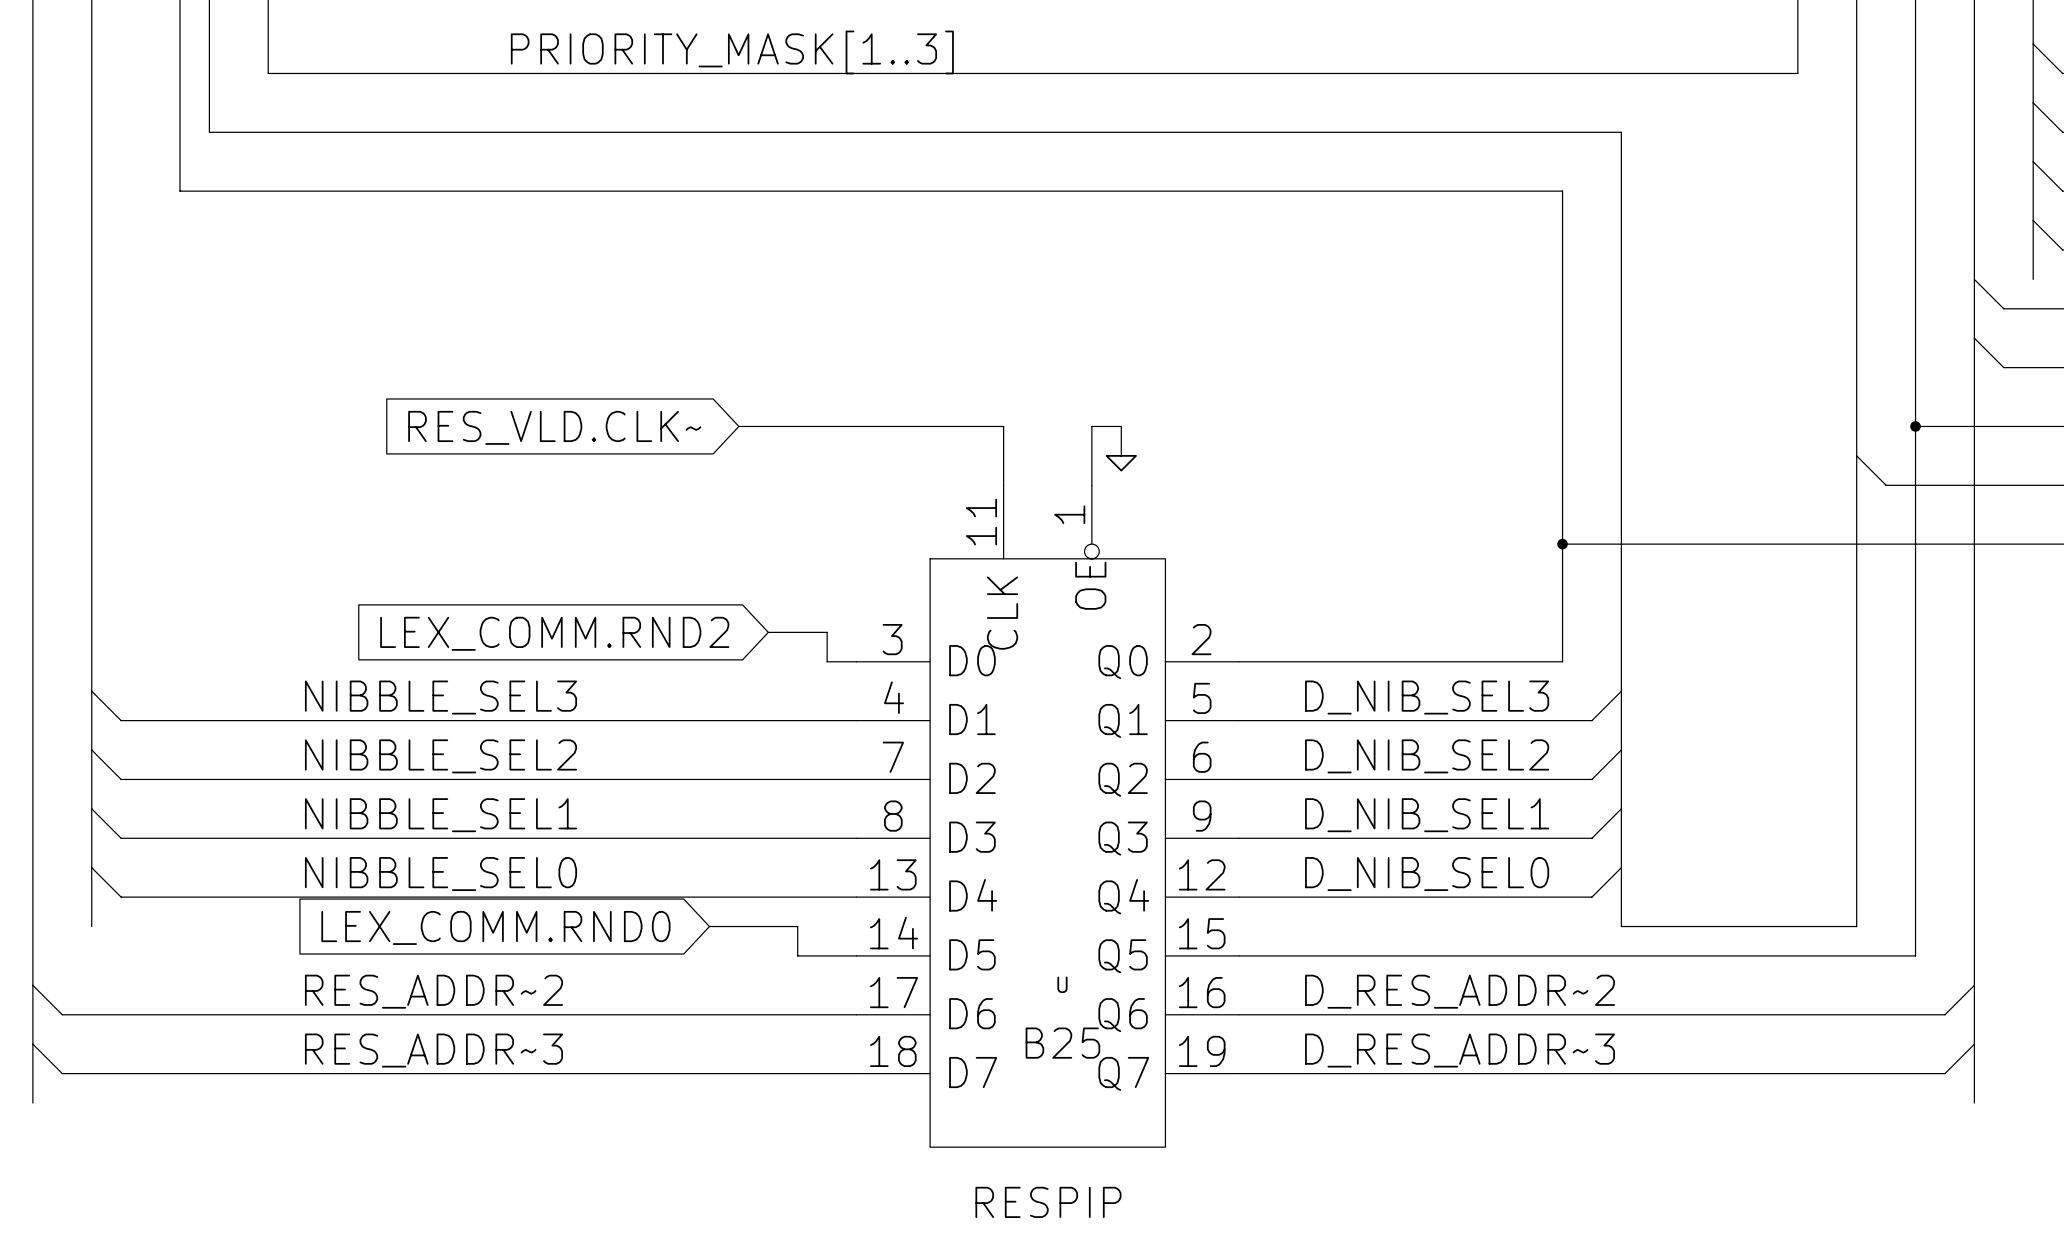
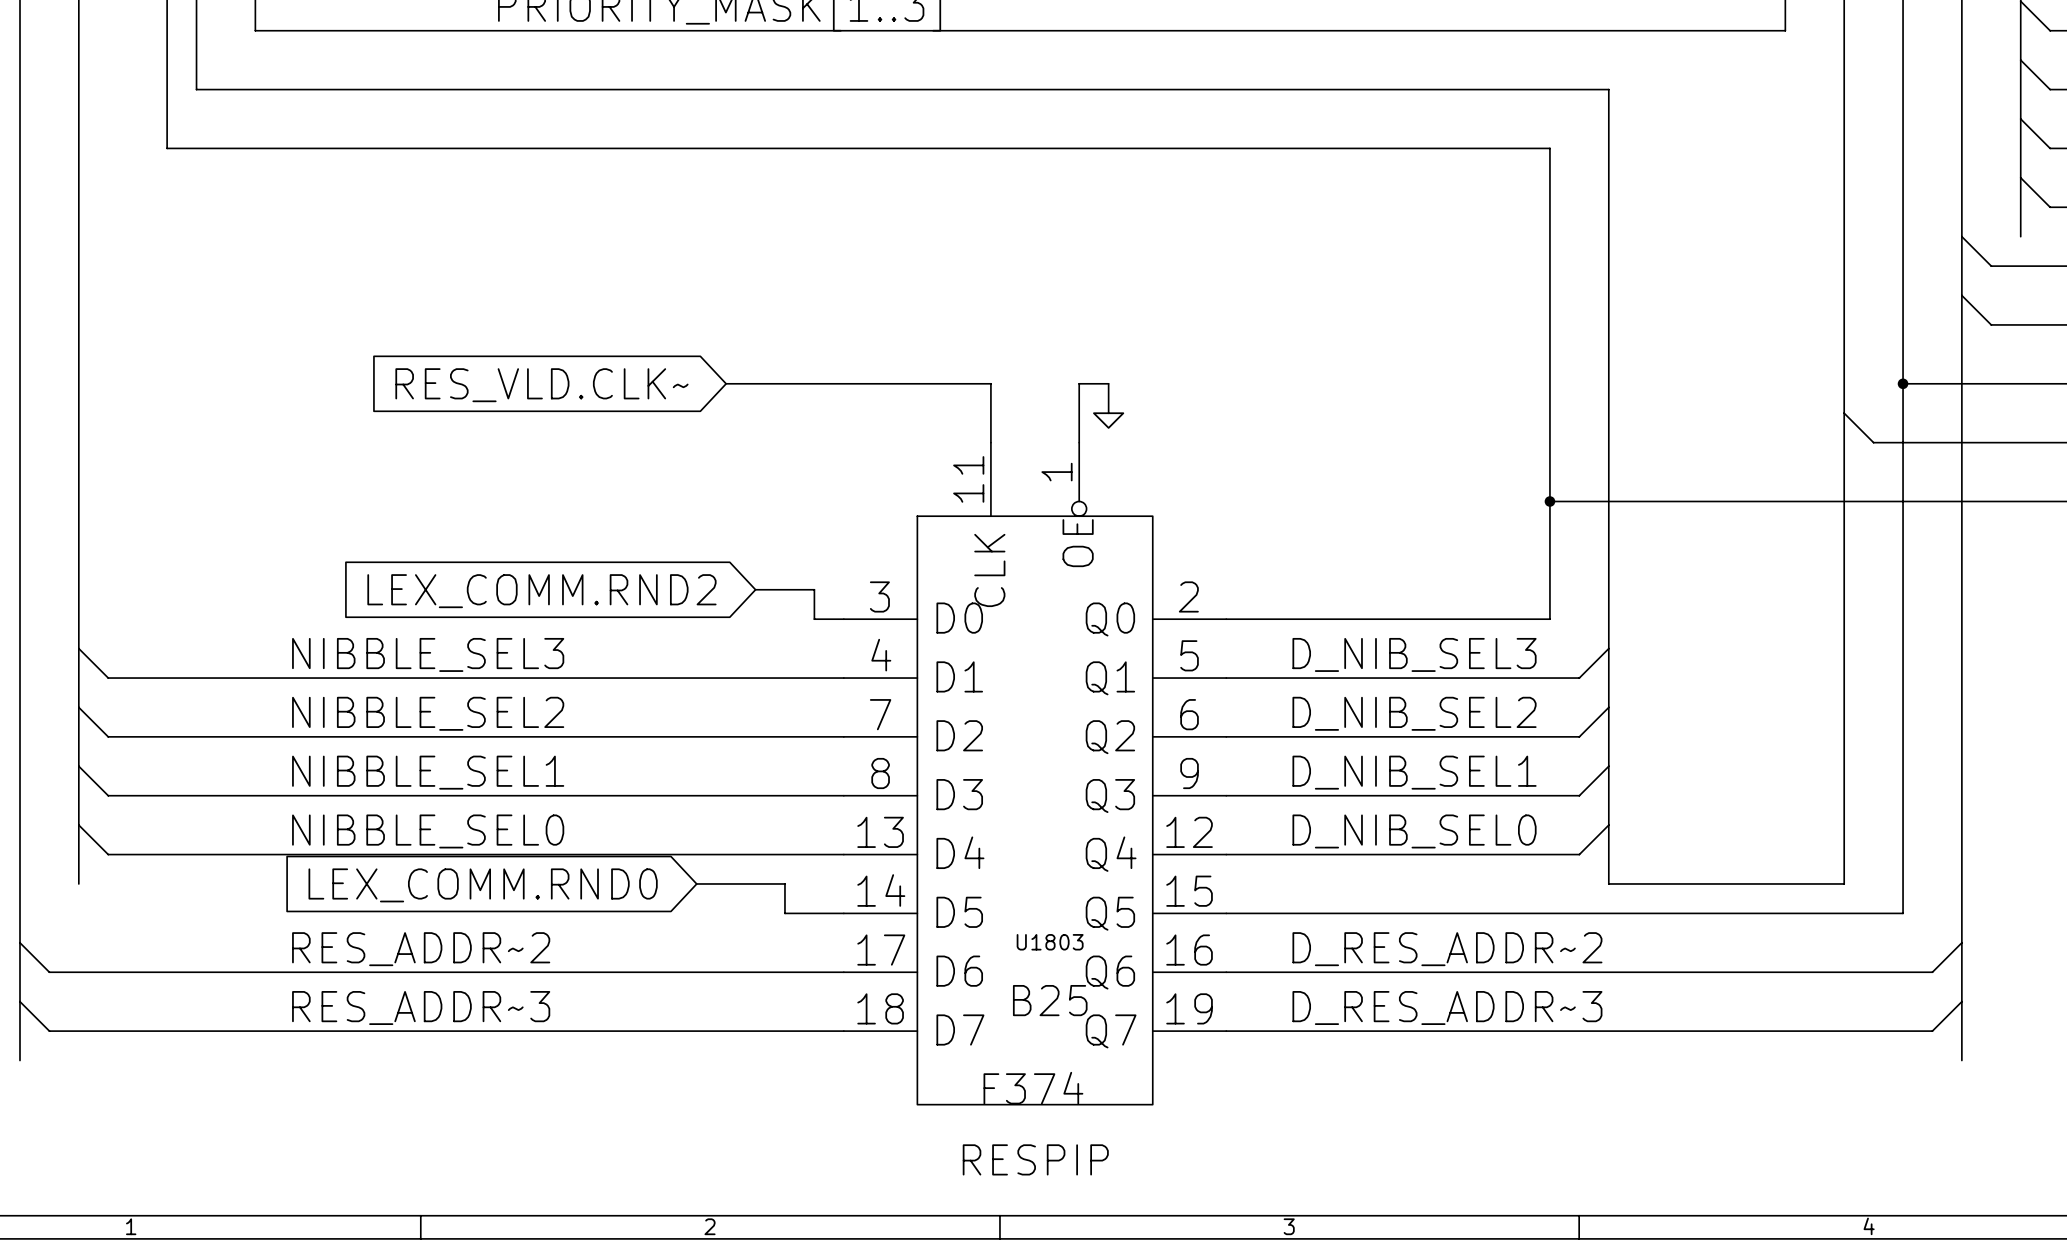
U name: U (1062, 984) -> U1803 (1050, 942)
U value: none -> F374 (1033, 1088)

